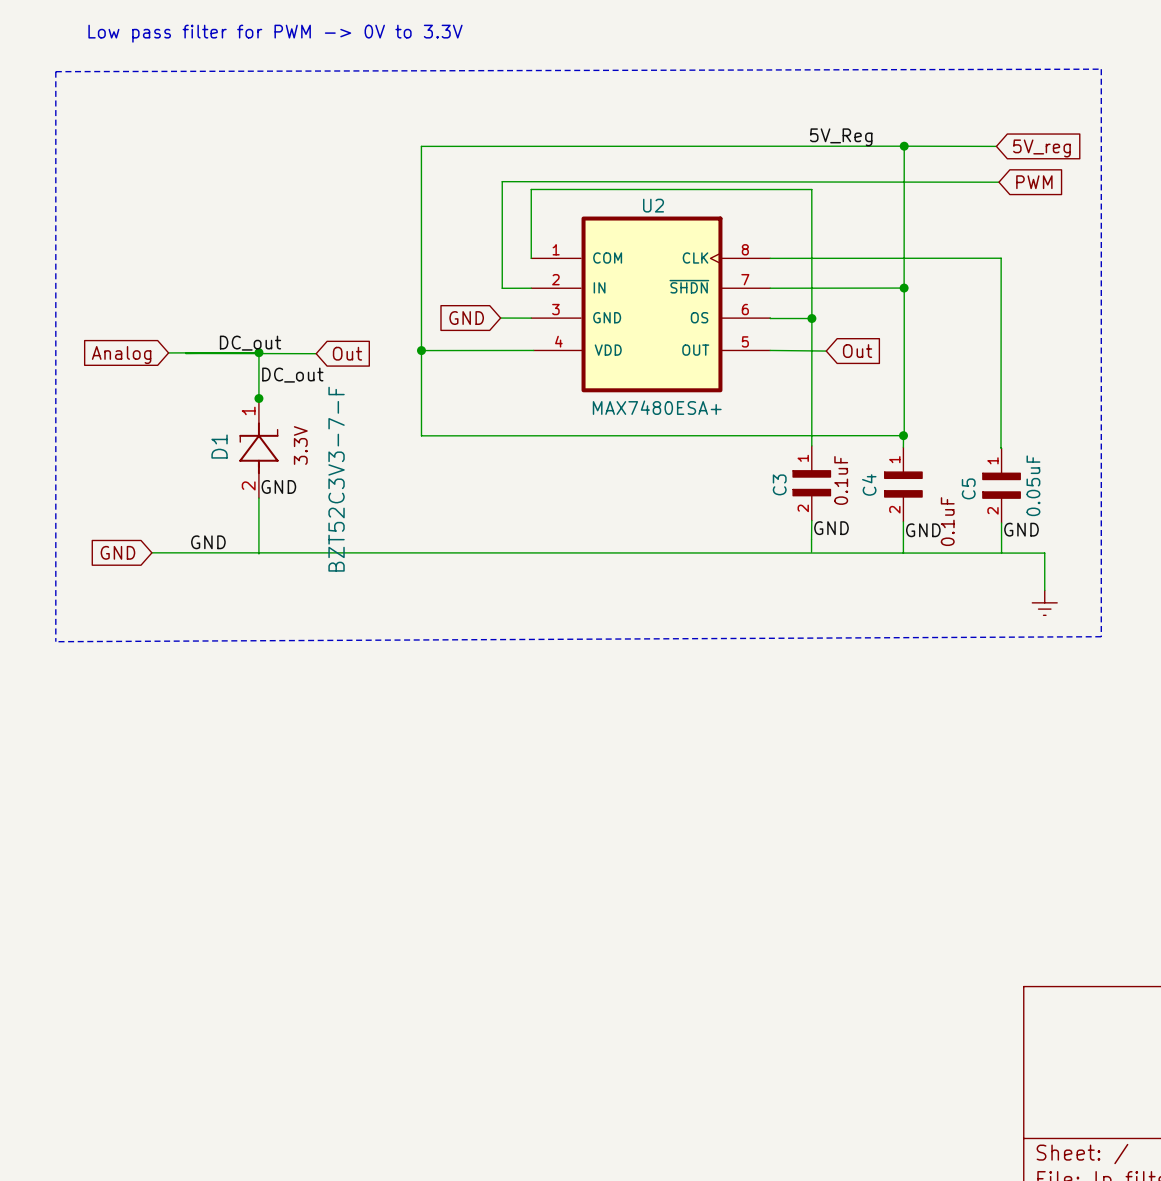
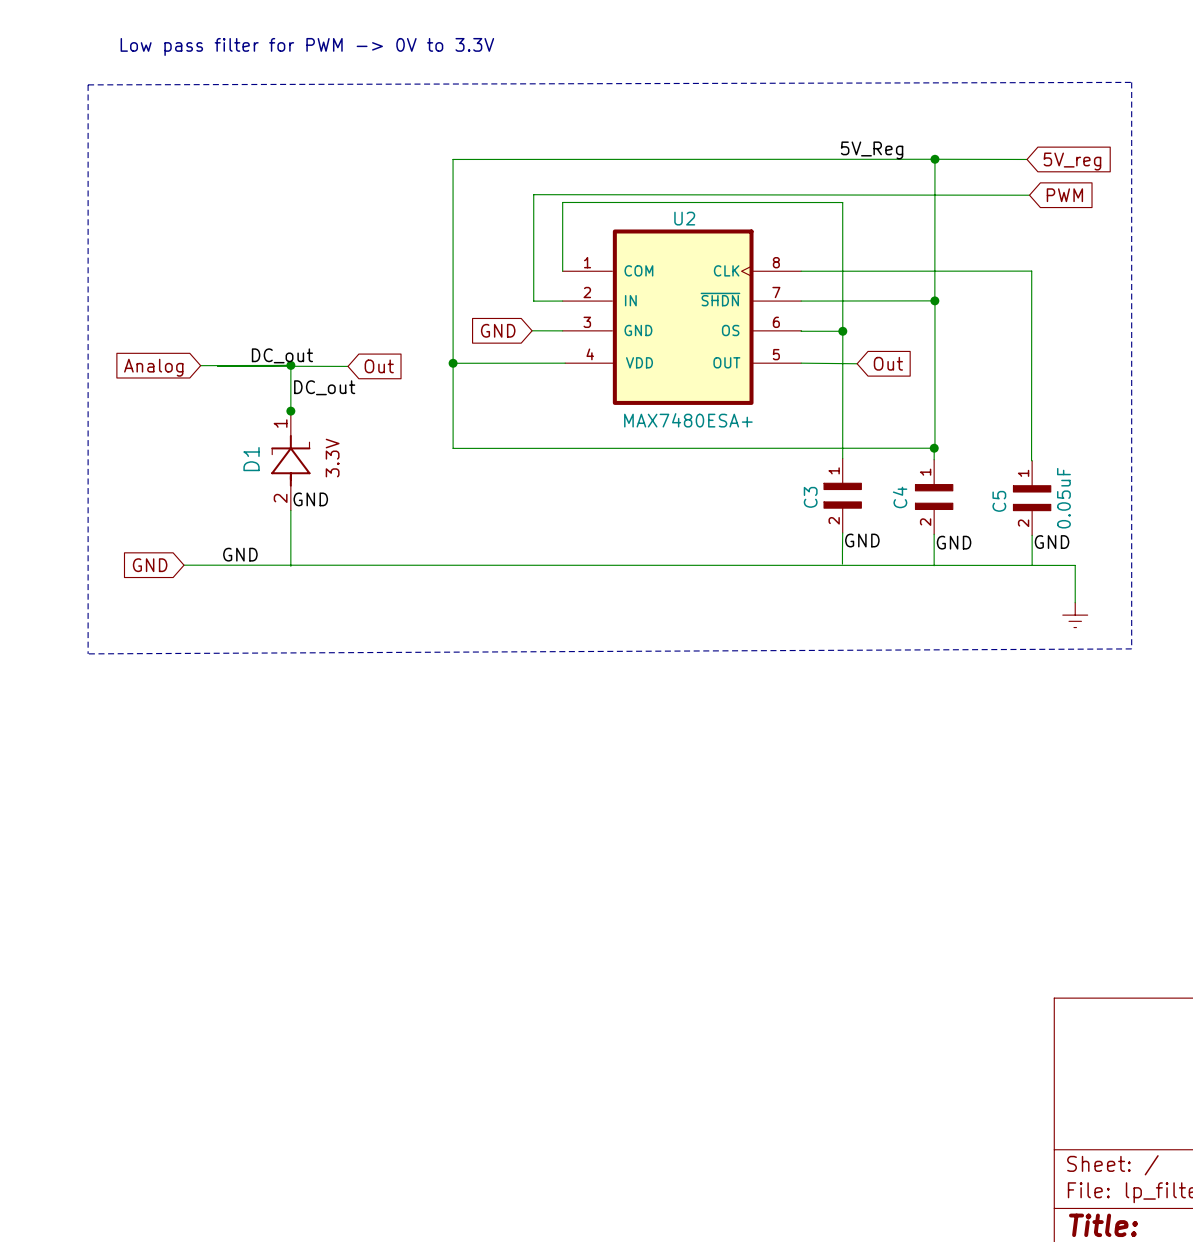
D1 value: BZT52C3V3-7-F (336, 479) -> none
C3 text: 0.1uF (841, 480) -> none
C4 text: 0.1uF (947, 521) -> none

